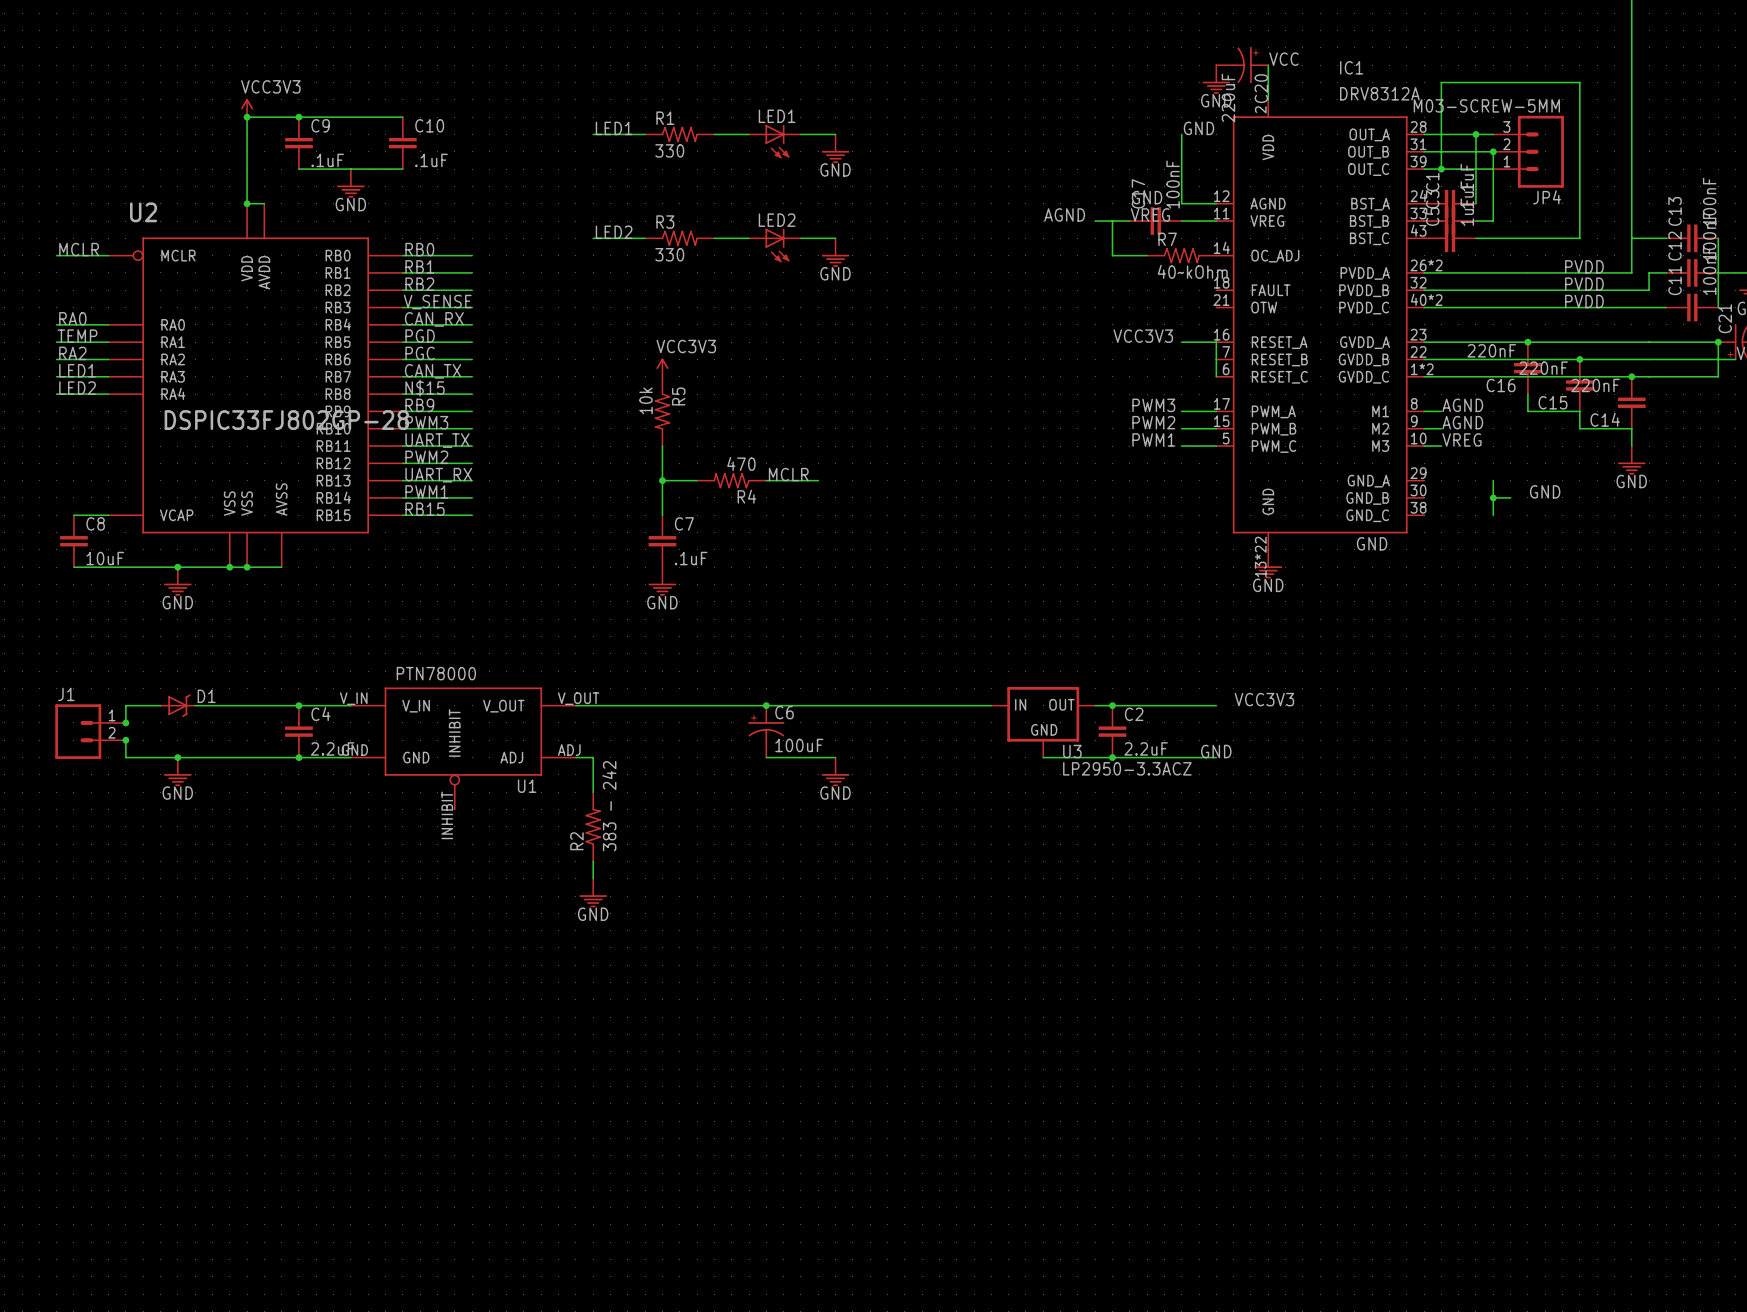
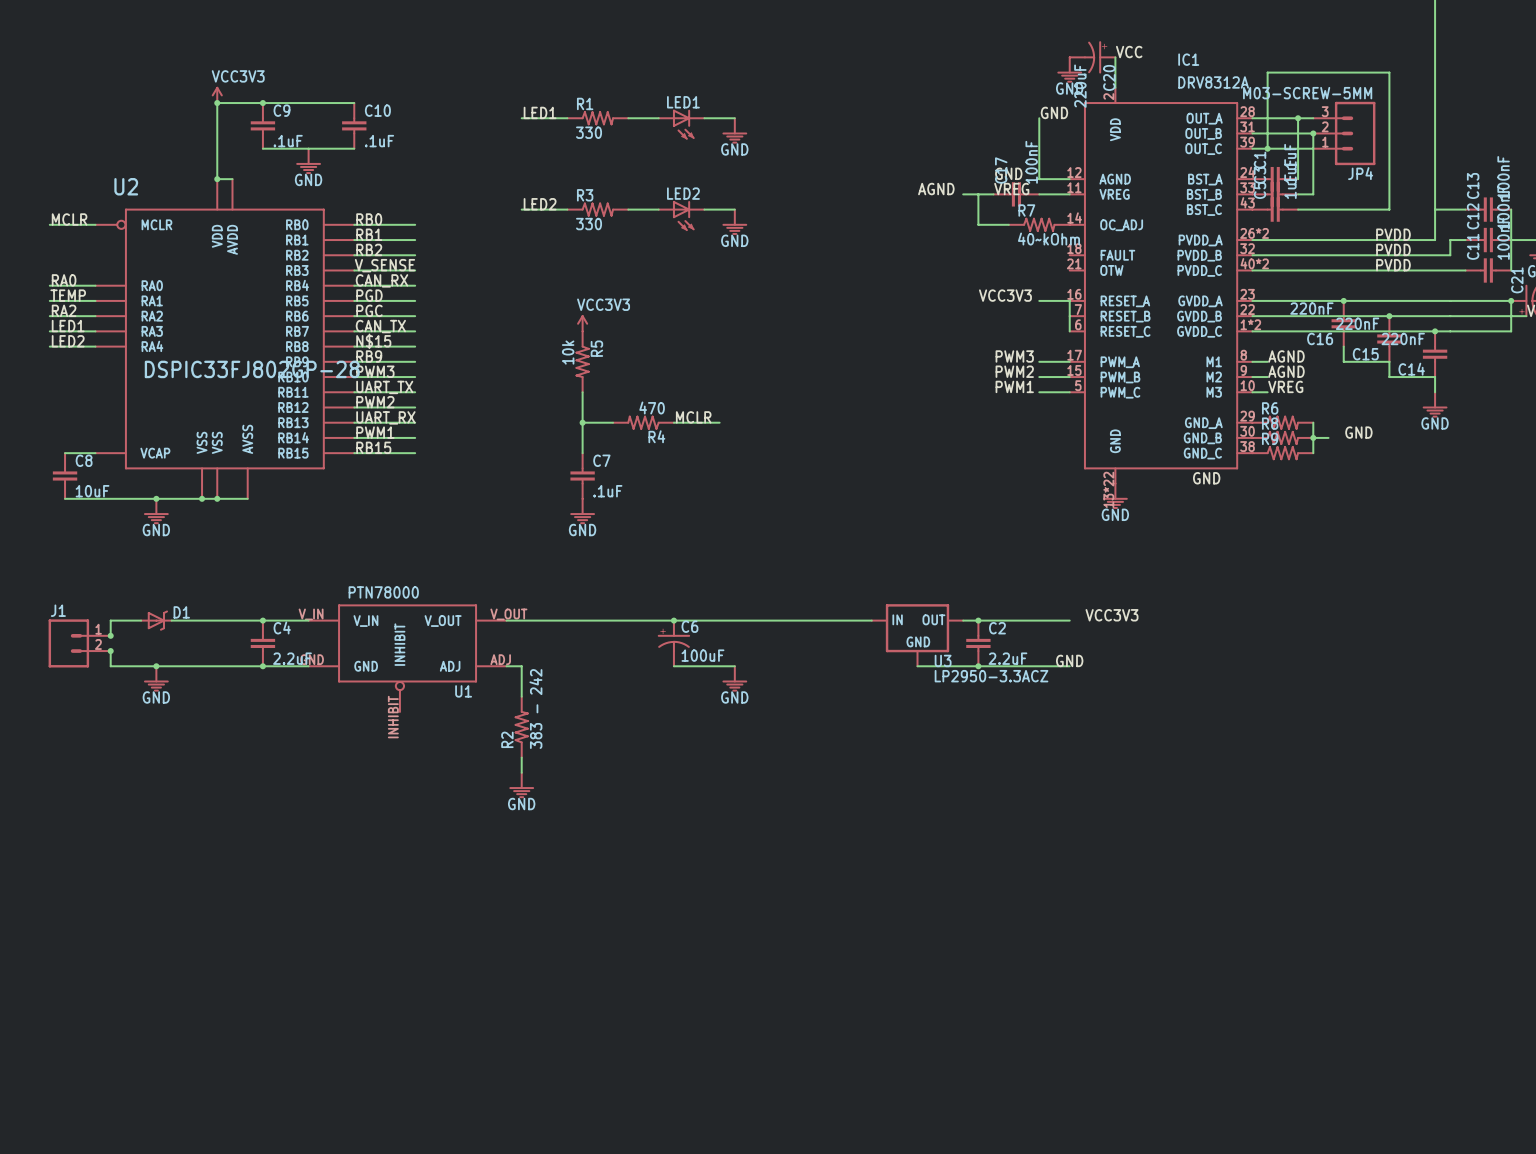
R6: none -> (1282, 422)
R8: none -> (1282, 437)
R9: none -> (1282, 453)

